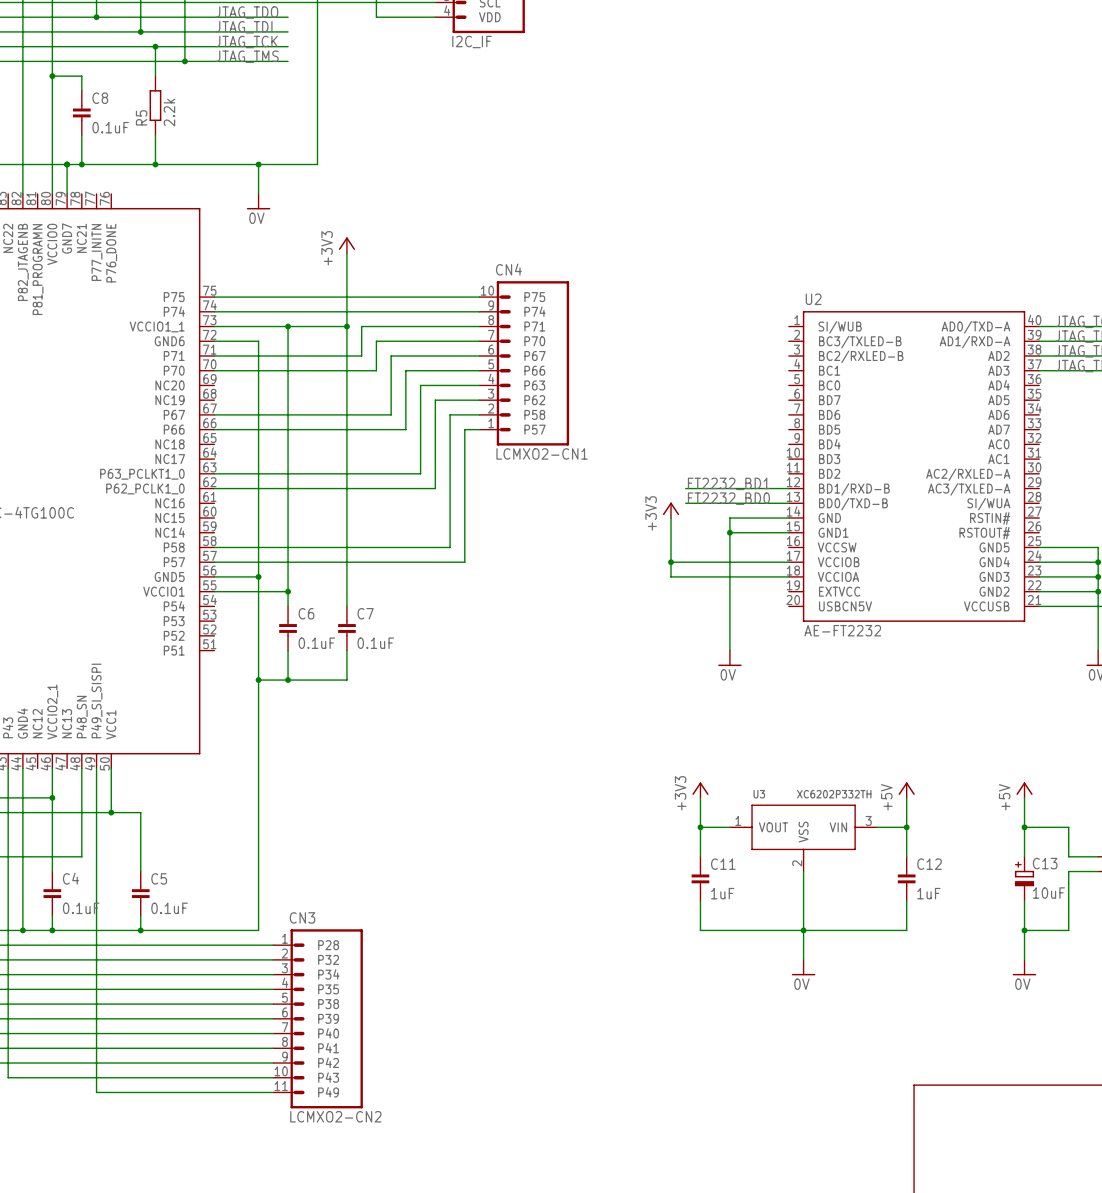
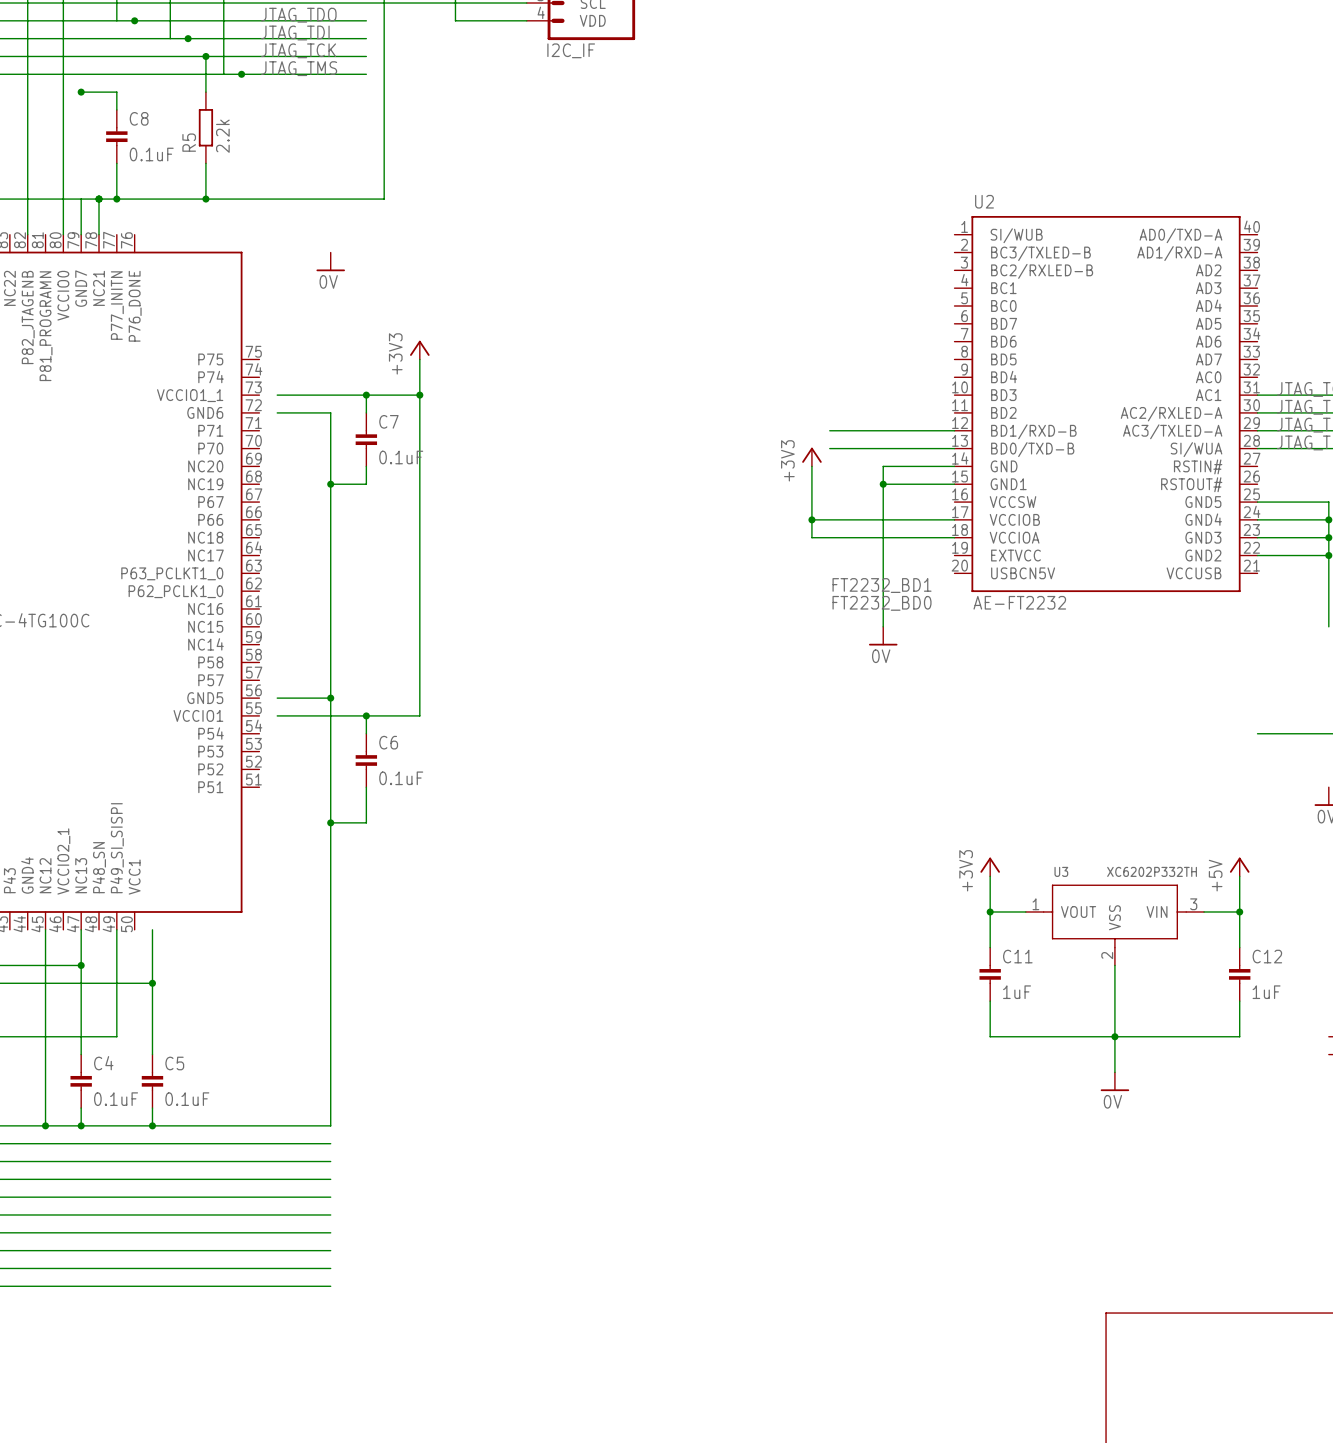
junction position: (96, 17) -> (134, 20)
wire: none -> (348, 20) (366, 20)
junction: (140, 31) -> none
junction: none -> (188, 38)
wire: none -> (348, 38) (366, 38)
wire: (155, 46) (155, 76) -> (205, 56) (205, 92)
junction: (155, 46) -> none
junction: none -> (205, 56)
wire: none -> (348, 56) (366, 56)
junction: (184, 61) -> none
junction: none -> (241, 74)
wire: none -> (348, 74) (366, 74)
wire: (52, 76) (67, 76) -> none
junction position: (52, 76) -> (81, 92)
wire: (81, 76) (81, 90) -> (99, 92) (116, 92) (116, 109)
R5 position: (155, 105) -> (205, 127)
C8 position: (81, 112) -> (116, 136)
wire: (81, 135) (81, 164) -> (99, 234) (99, 199)
wire: none -> (116, 163) (116, 199)
wire: (155, 135) (155, 164) -> (205, 163) (205, 199)
junction: (67, 164) -> none
junction: none -> (116, 199)
junction position: (155, 164) -> (205, 199)
wire: (258, 164) (258, 193) -> none
junction: (258, 164) -> none
power symbol position: 0V (258, 201) -> 0V (330, 261)
power symbol position: +3V3 (346, 245) -> +3V3 (419, 350)
wire: (346, 252) (346, 297) -> none
wire: (214, 297) (479, 297) -> none
wire: (214, 311) (479, 311) -> none
wire: (214, 326) (229, 326) -> none
wire: (288, 326) (288, 606) -> none
junction position: (288, 326) -> (366, 395)
wire: none -> (366, 395) (366, 412)
wire: (479, 326) (361, 326) (361, 355) (214, 355) -> none
wire: (214, 341) (229, 341) -> none
wire: (258, 341) (258, 930) -> (312, 412) (330, 412) (330, 1125) (312, 1125)
wire: (479, 341) (376, 341) (376, 370) (214, 370) -> none
wire: (479, 355) (391, 355) (391, 414) (214, 414) -> none
CN4: LCMXO2-CN1 (524, 363) -> none
wire: (479, 370) (405, 370) (405, 429) (214, 429) -> none
power symbol: none -> +3V3 (811, 457)
wire: none -> (366, 466) (366, 484) (330, 484)
wire: (479, 385) (420, 385) (420, 473) (214, 473) -> none
junction: none -> (330, 484)
wire: (479, 400) (435, 400) (435, 488) (214, 488) -> none
junction: none -> (883, 484)
wire: (479, 414) (450, 414) (450, 547) (214, 547) -> none
wire: (479, 429) (464, 429) (464, 562) (214, 562) -> none
junction: none -> (811, 519)
junction: none -> (1328, 519)
junction: none -> (1328, 537)
junction: none -> (1328, 555)
U2 position: (914, 466) -> (1106, 404)
wire: (685, 488) (788, 488) -> (829, 430) (954, 430)
wire: (685, 503) (788, 503) -> (829, 448) (954, 448)
power symbol: +3V3 (671, 510) -> none
wire: (671, 518) (671, 576) (788, 576) -> (811, 466) (811, 537) (954, 537)
wire: (788, 518) (729, 518) (729, 650) -> (954, 466) (883, 466) (883, 626)
wire: (729, 532) (788, 532) -> (883, 484) (954, 484)
junction: (729, 532) -> none
wire: (1039, 547) (1098, 547) (1098, 650) -> (1257, 502) (1328, 502) (1328, 626)
wire: (671, 562) (788, 562) -> (811, 519) (954, 519)
junction: (671, 562) -> none
wire: (1039, 562) (1098, 562) -> (1257, 519) (1328, 519)
junction: (1098, 562) -> none
wire: (214, 576) (229, 576) -> (312, 698) (330, 698)
junction: (258, 576) -> none
junction: none -> (330, 698)
wire: (1039, 576) (1098, 576) -> (1257, 537) (1328, 537)
junction: (1098, 576) -> none
wire: (214, 591) (229, 591) -> none
junction: (288, 591) -> none
wire: none -> (366, 715) (366, 733)
junction: none -> (366, 715)
wire: (346, 591) (346, 606) -> (419, 715) (348, 715)
wire: (1039, 591) (1098, 591) -> (1257, 555) (1328, 555)
junction: (1098, 591) -> none
C6 position: (288, 628) -> (366, 760)
C7 position: (346, 628) -> (366, 439)
wire: (288, 650) (288, 680) -> none
wire: (346, 650) (346, 680) (302, 680) -> (366, 787) (366, 822)
power symbol position: 0V (729, 658) -> 0V (883, 636)
wire: (258, 680) (273, 680) -> none
junction: (258, 680) -> none
junction: none -> (330, 822)
junction: (288, 680) -> none
power symbol: none -> +3V3 (990, 866)
power symbol: none -> +5V (1239, 866)
junction: none -> (990, 911)
junction: none -> (1239, 911)
wire: (8, 768) (8, 1077) (273, 1077) -> none
wire: (22, 768) (22, 930) -> (45, 929) (45, 1125)
wire: (52, 768) (52, 871) -> (81, 929) (81, 1054)
wire: (81, 768) (81, 856) -> (116, 1036) (99, 1036)
wire: (111, 768) (111, 812) -> none
wire: none -> (152, 929) (152, 1054)
power symbol: +3V3 (700, 790) -> none
power symbol: +5V (906, 790) -> none
power symbol: +5V (1024, 790) -> none
wire: none -> (63, 965) (81, 965)
junction position: (52, 797) -> (81, 965)
wire: (700, 797) (700, 856) -> (990, 876) (990, 947)
wire: (906, 797) (906, 856) -> (1239, 876) (1239, 947)
wire: (1024, 797) (1024, 827) (1068, 827) (1068, 856) (1098, 856) -> none
junction position: (111, 812) -> (152, 983)
wire: (126, 812) (140, 812) (140, 871) -> none
wire: (700, 827) (729, 827) -> (990, 911) (1025, 911)
junction: (700, 827) -> none
wire: none -> (990, 1001) (990, 1036) (1239, 1036)
wire: (877, 827) (906, 827) -> (1204, 911) (1239, 911)
junction position: (906, 827) -> (1114, 1036)
junction: (1024, 827) -> none
U3 position: (803, 838) -> (1114, 925)
wire: (96, 856) (96, 1092) (273, 1092) -> none
wire: (803, 871) (803, 959) -> (1114, 965) (1114, 1072)
wire: (1098, 871) (1068, 871) (1068, 930) (1024, 930) -> none
C11 position: (700, 878) -> (990, 974)
C12 position: (906, 878) -> (1239, 974)
C13: 10uF (1024, 878) -> none
C4 position: (52, 893) -> (81, 1081)
C5 position: (140, 893) -> (152, 1081)
power symbol: none -> 0V (1114, 1081)
wire: (700, 900) (700, 930) (906, 930) (906, 900) -> none
wire: (1024, 900) (1024, 959) -> none
wire: (52, 915) (52, 930) -> (81, 1108) (81, 1125)
wire: (140, 915) (140, 930) -> (152, 1108) (152, 1125)
junction: (22, 930) -> none
junction: none -> (45, 1125)
junction: (52, 930) -> none
junction: none -> (81, 1125)
junction position: (140, 930) -> (152, 1125)
junction: (803, 930) -> none
junction: (1024, 930) -> none
power symbol: 0V (803, 967) -> none
power symbol: 0V (1024, 967) -> none
CN3: LCMXO2-CN2 (318, 1018) -> none

